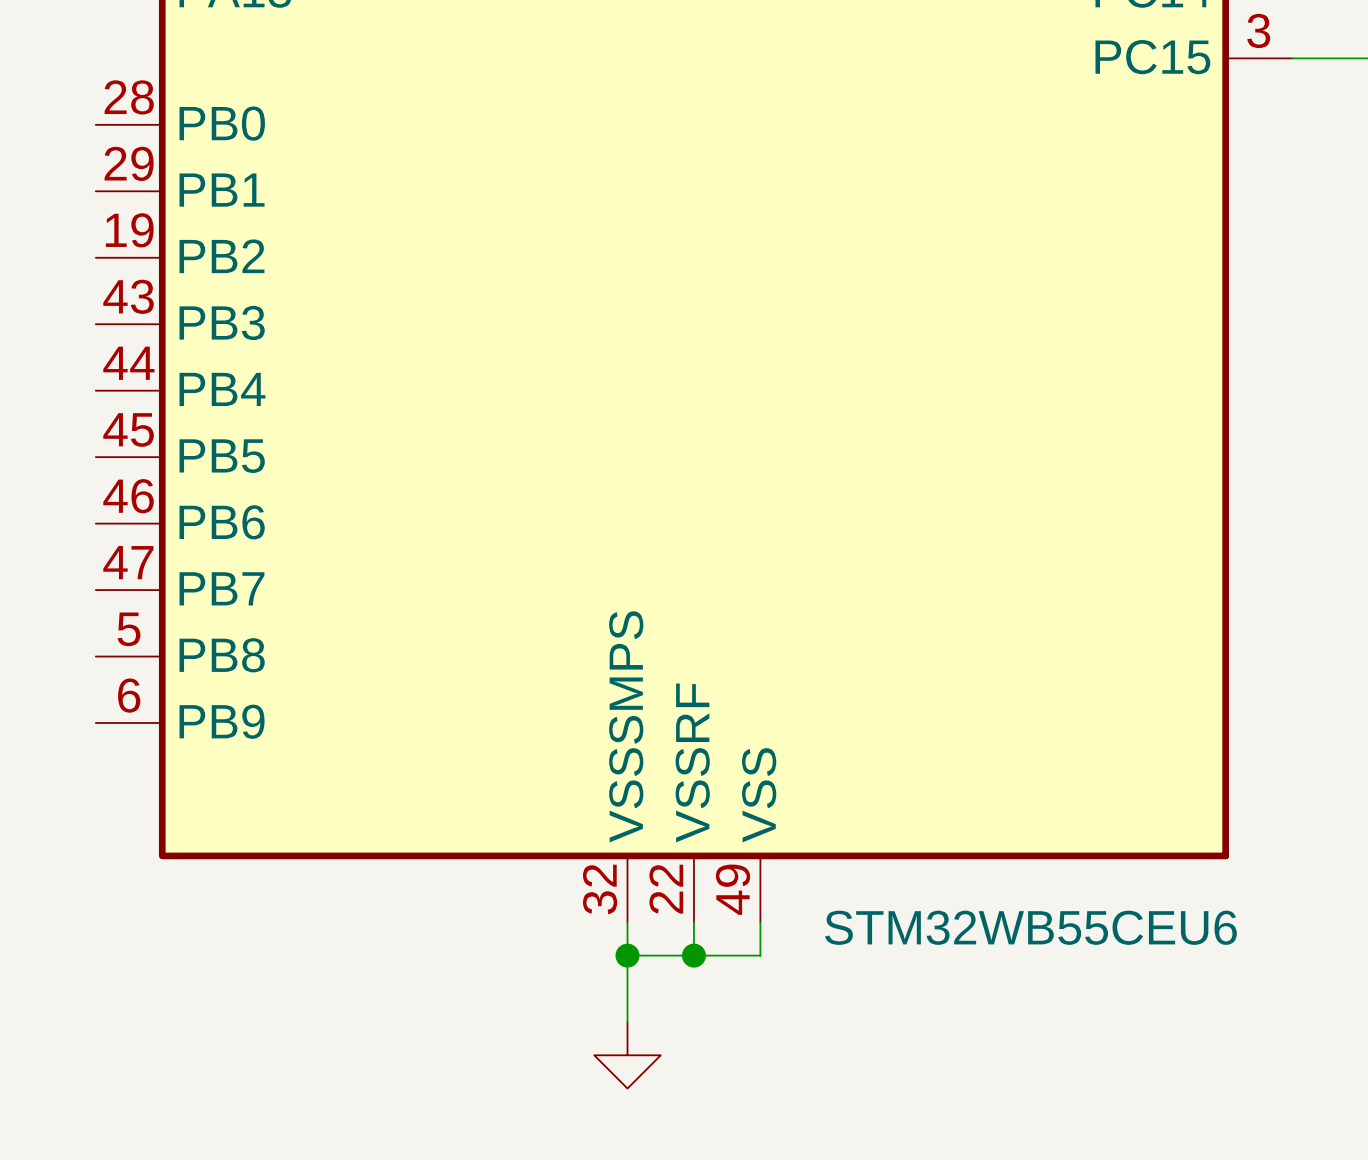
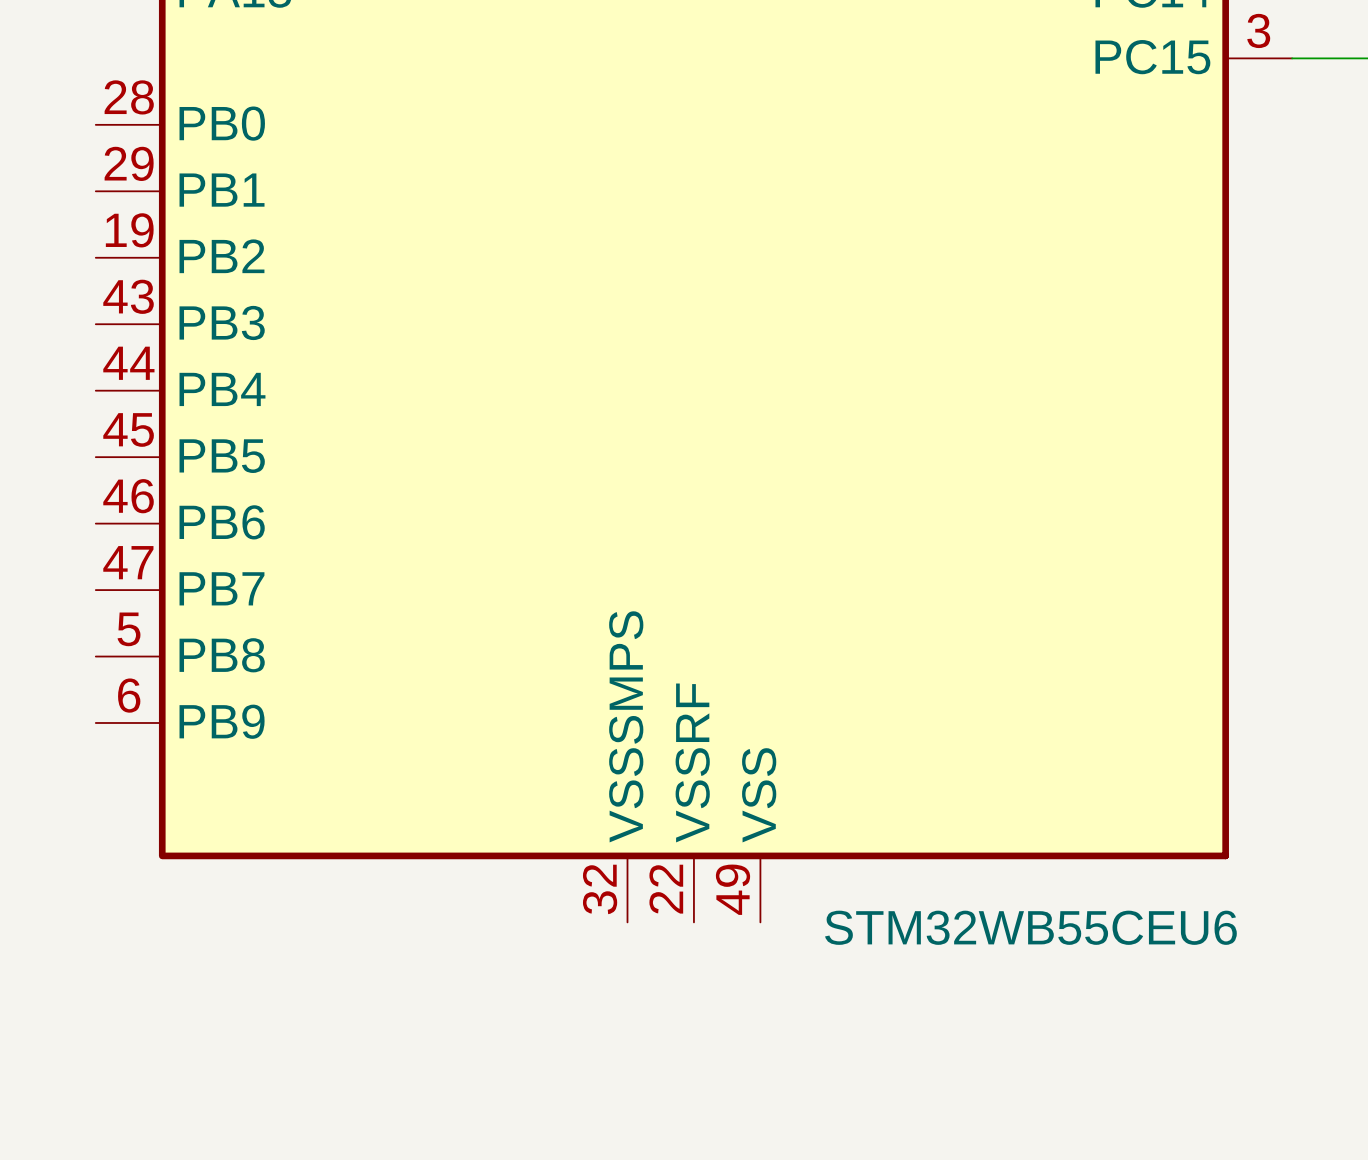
wire: (627, 922) (627, 1022) -> none
wire: (693, 922) (693, 955) -> none
wire: (760, 922) (760, 955) (627, 955) -> none
junction: (627, 955) -> none
junction: (693, 955) -> none
power symbol: (627, 1055) -> none

